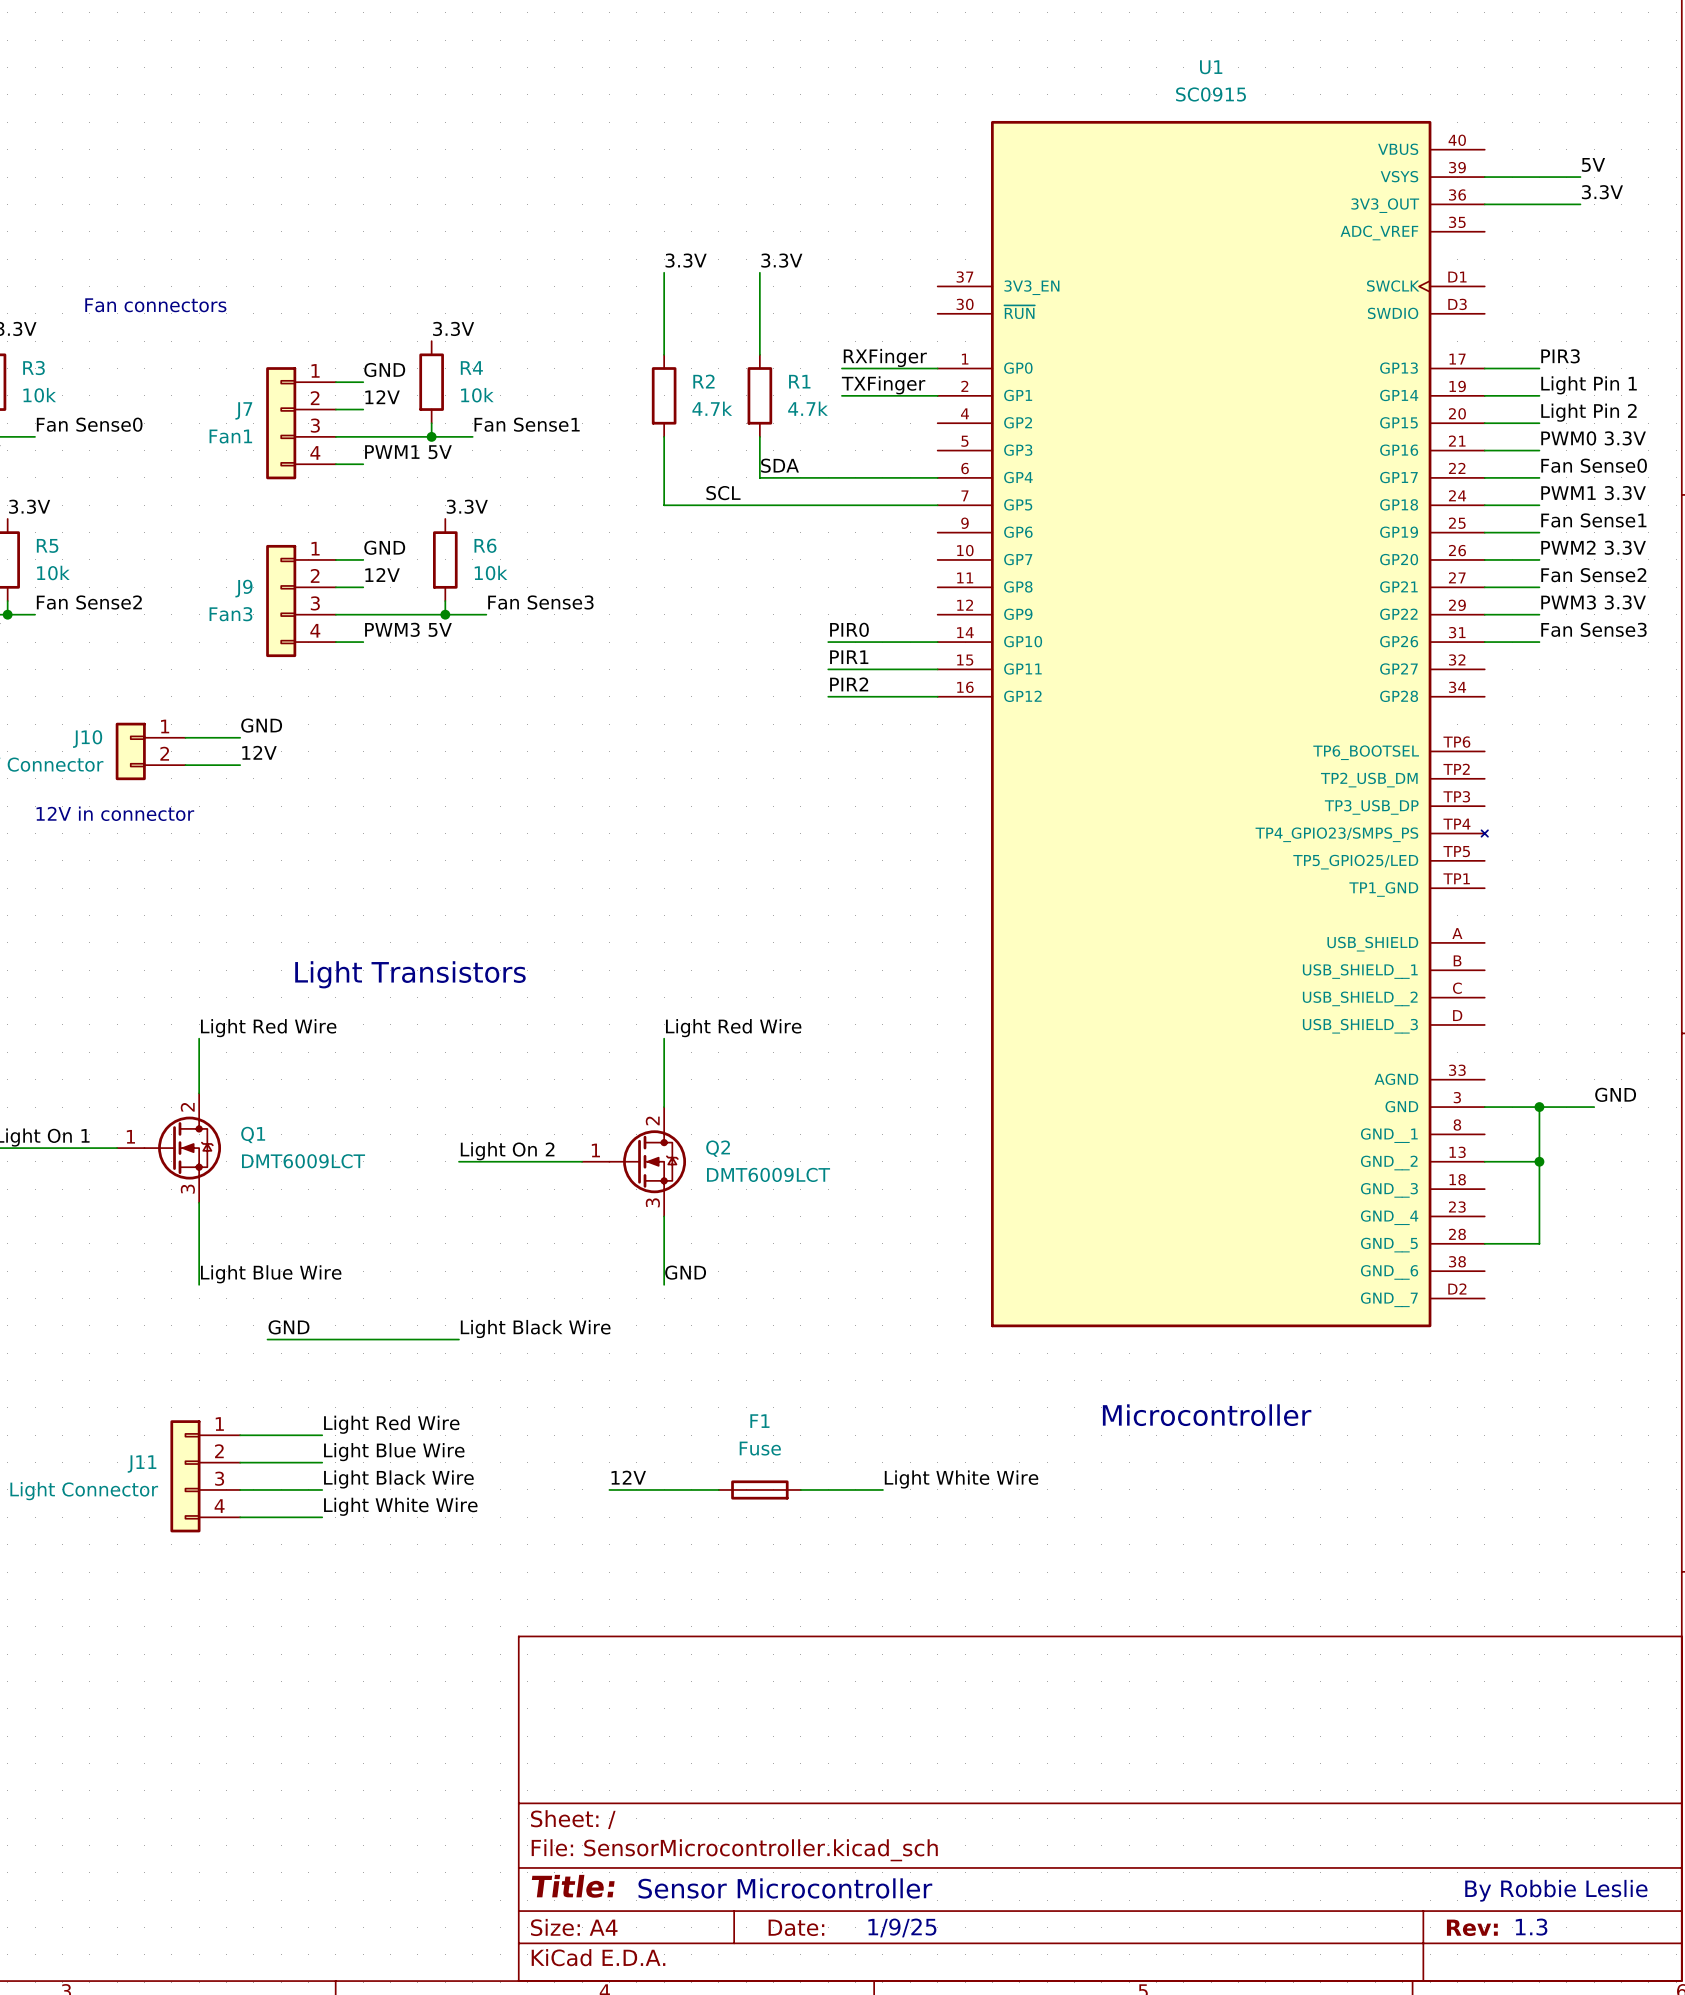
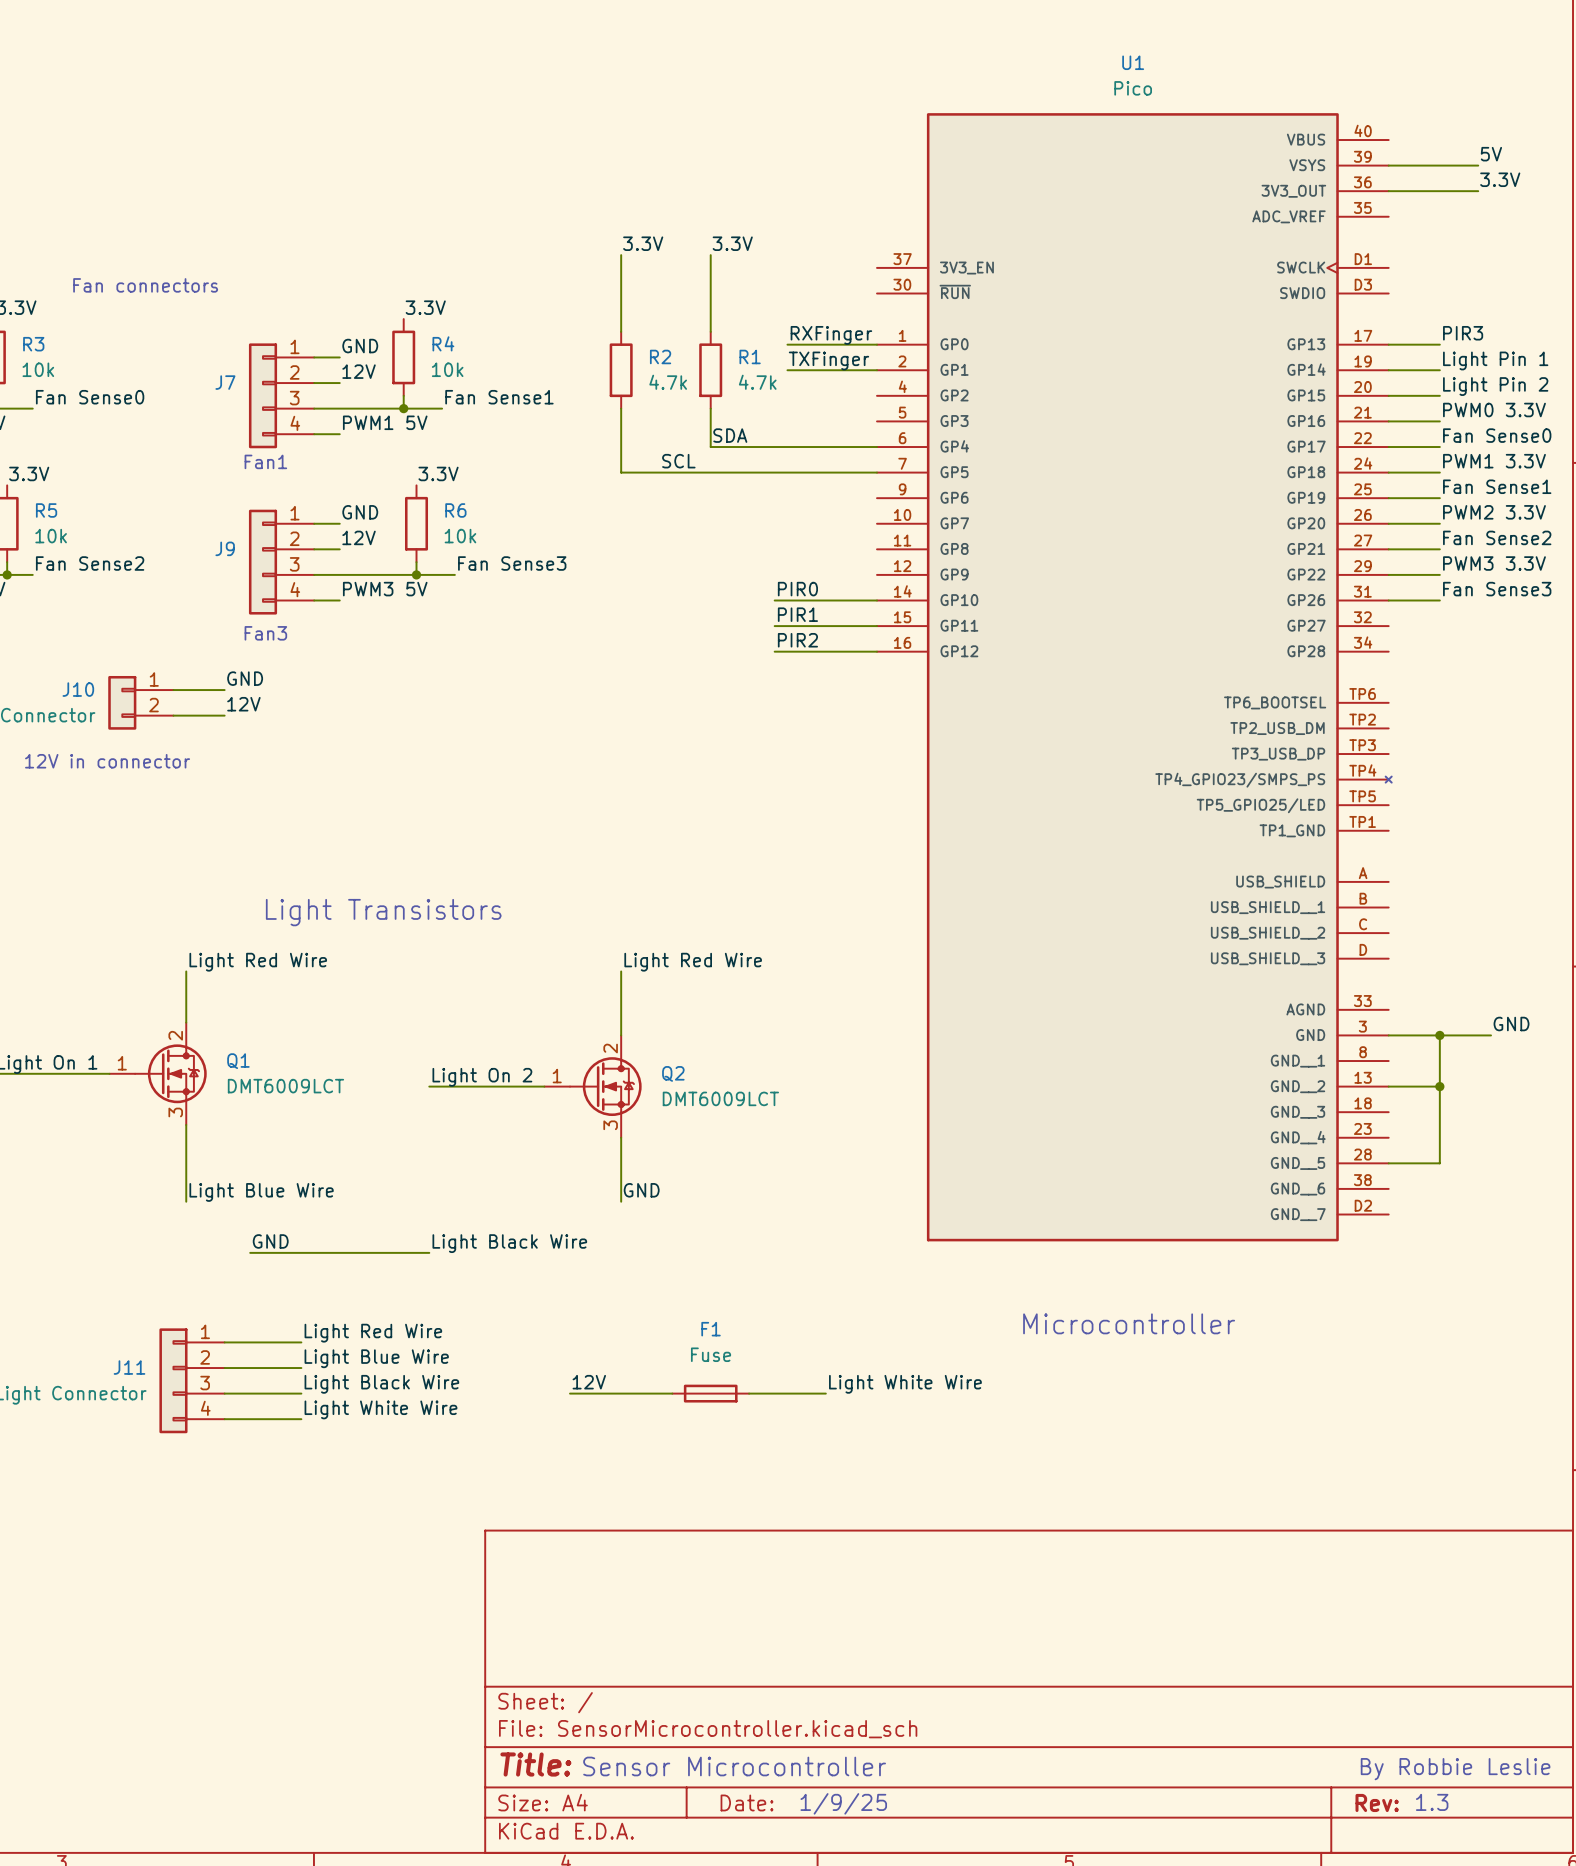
U1 value: SC0915 (1211, 94) -> Pico (1133, 88)
J7 value: Fan1 (230, 436) -> none
text: none -> Fan1 (265, 461)
J9 value: Fan3 (230, 614) -> none
text: none -> Fan3 (265, 633)

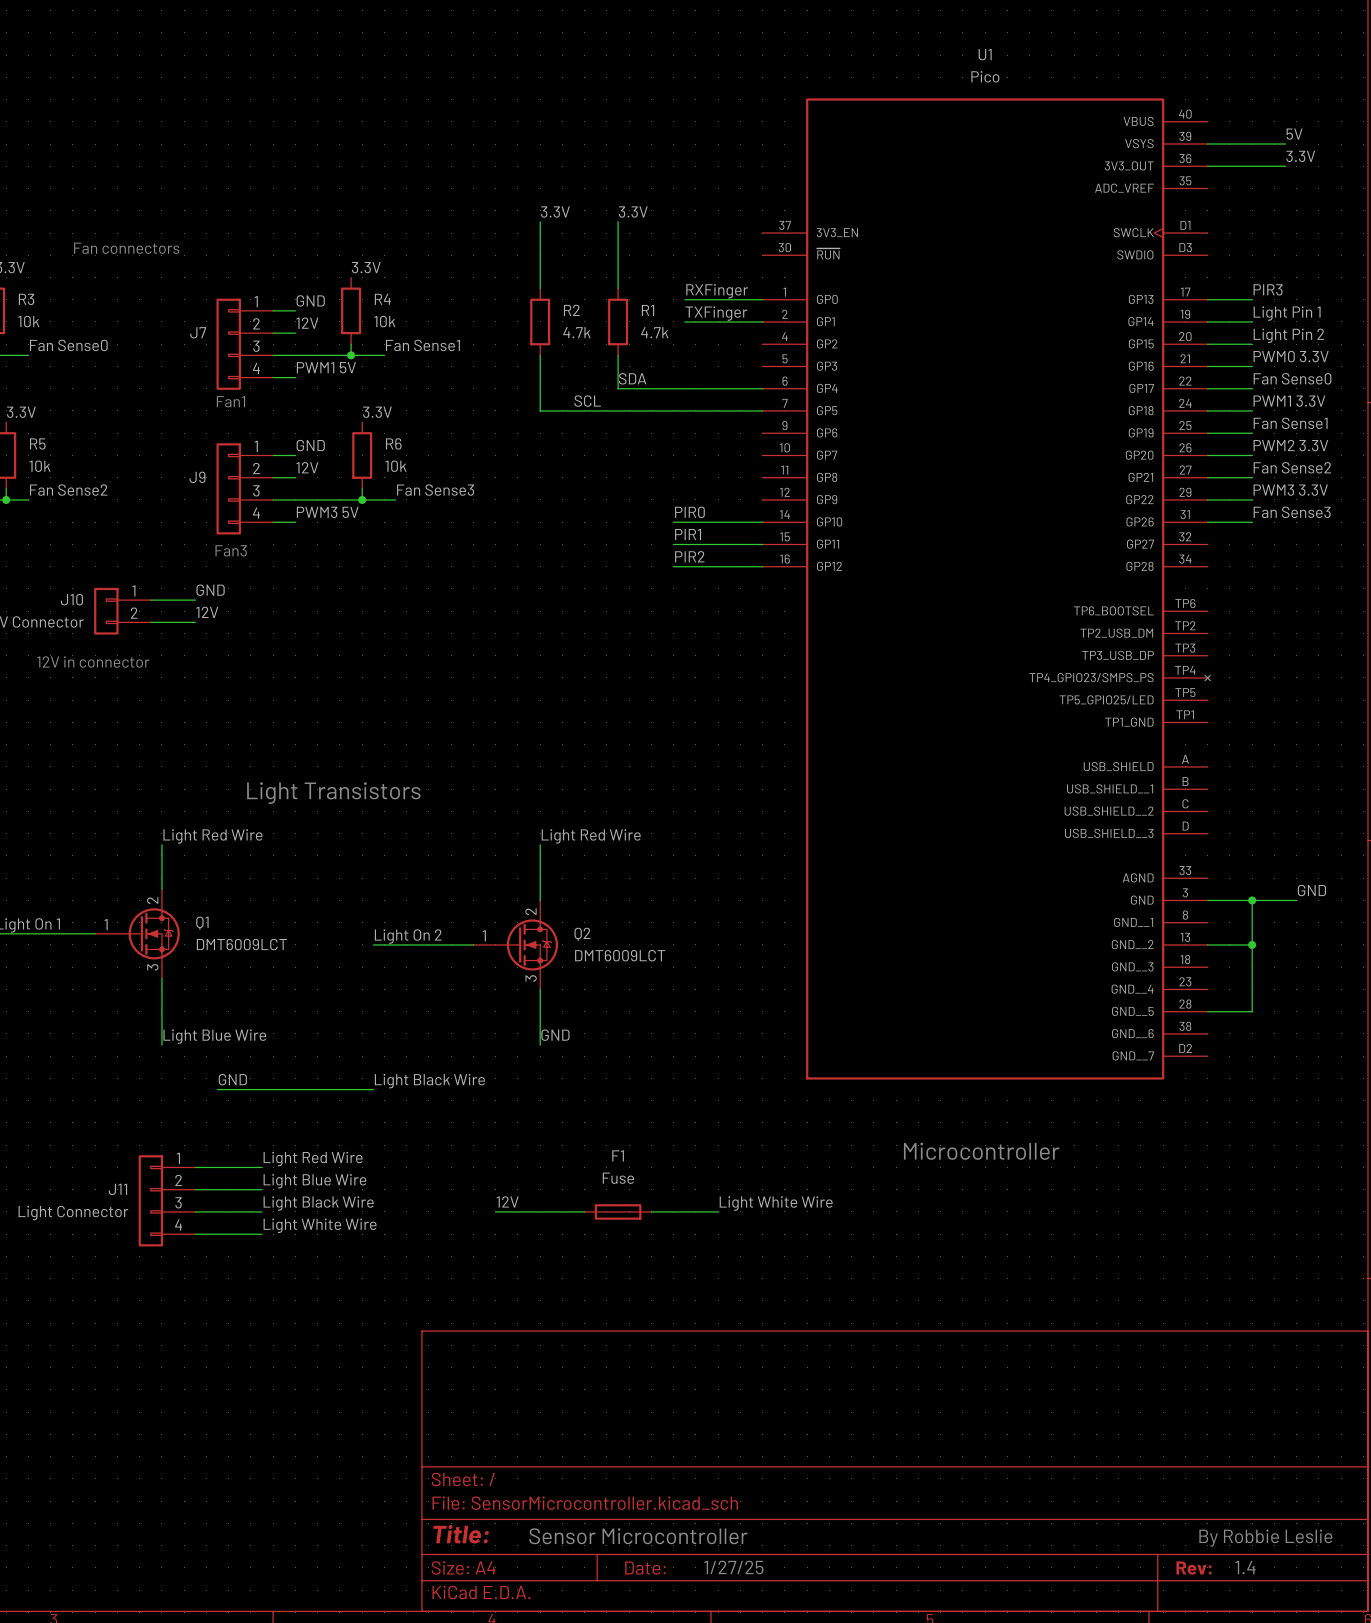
text: 1.3 (1432, 1802) -> 1.4 (1245, 1567)
text: 1/9/25 (843, 1803) -> 1/27/25 (733, 1567)

